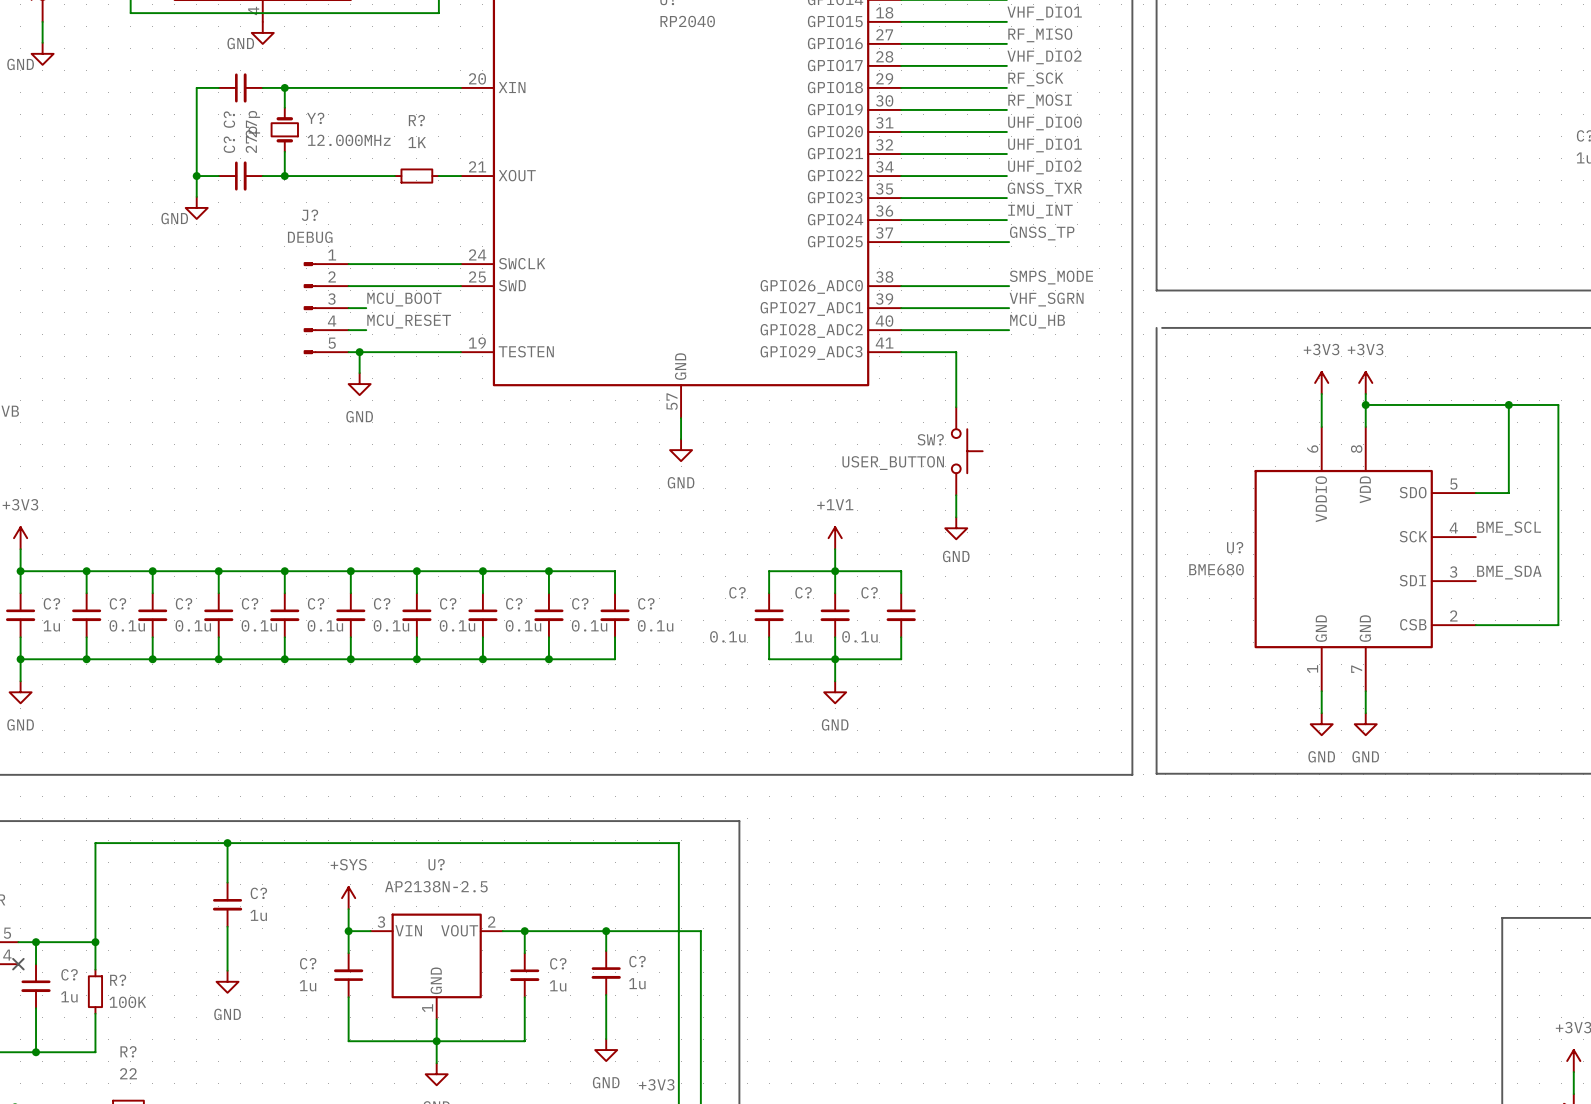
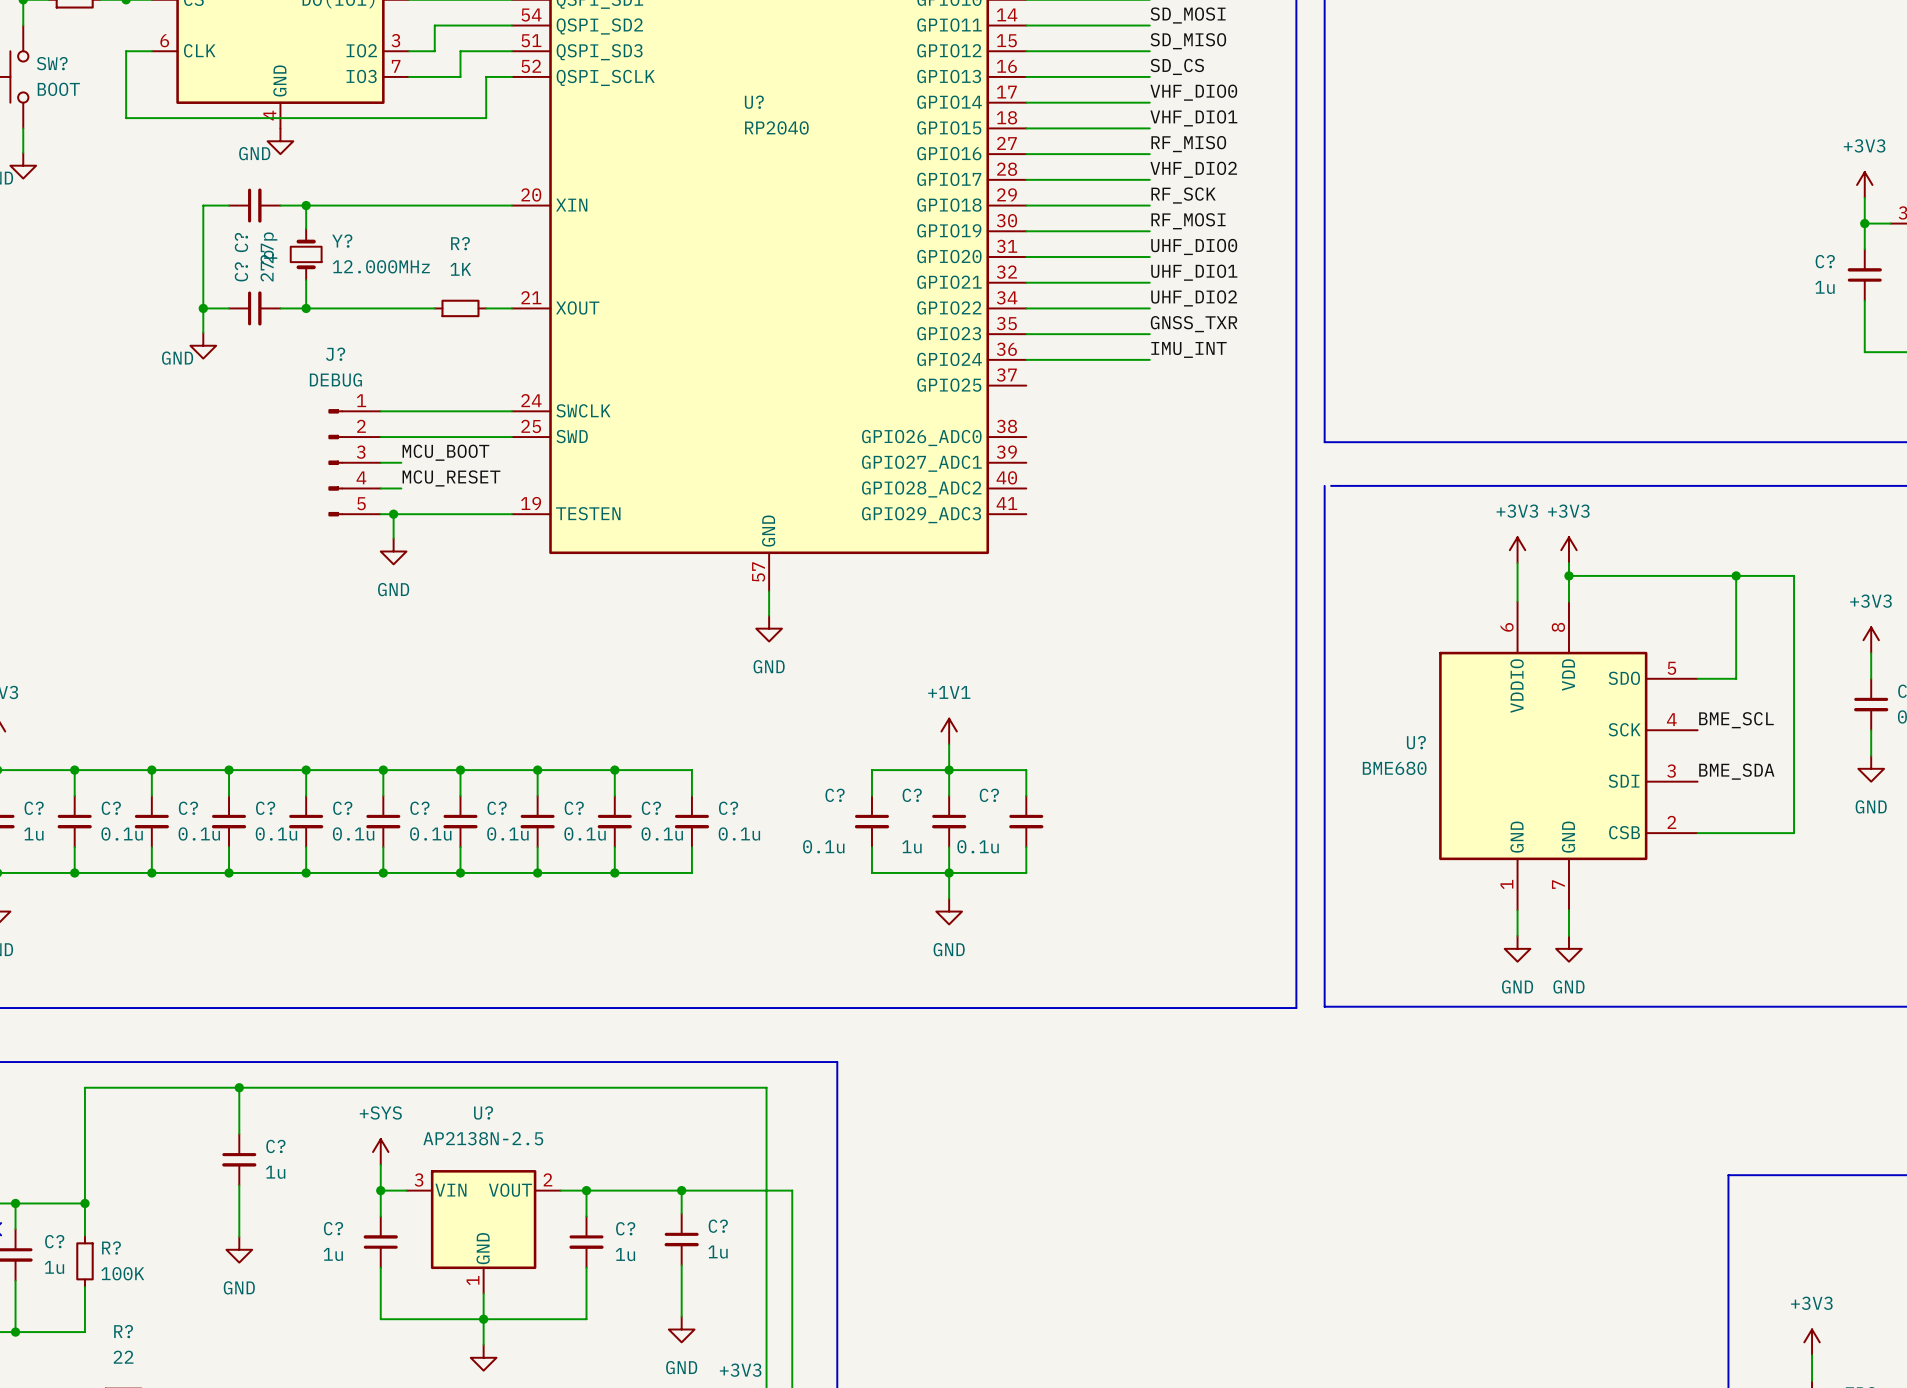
label: GNSS_TP (1042, 233) -> none
wire: (901, 242) (1009, 242) -> none
label: SMPS_MODE (1051, 277) -> none
wire: (901, 286) (1009, 286) -> none
label: VHF_SGRN (1046, 299) -> none
wire: (901, 308) (1009, 308) -> none
label: MCU_HB (1037, 321) -> none
wire: (901, 330) (1009, 330) -> none
wire: (901, 352) (956, 352) (956, 407) -> none
SW?: USER_BUTTON (967, 451) -> none
wire: (956, 495) (956, 517) -> none
power symbol: GND (956, 528) -> none

